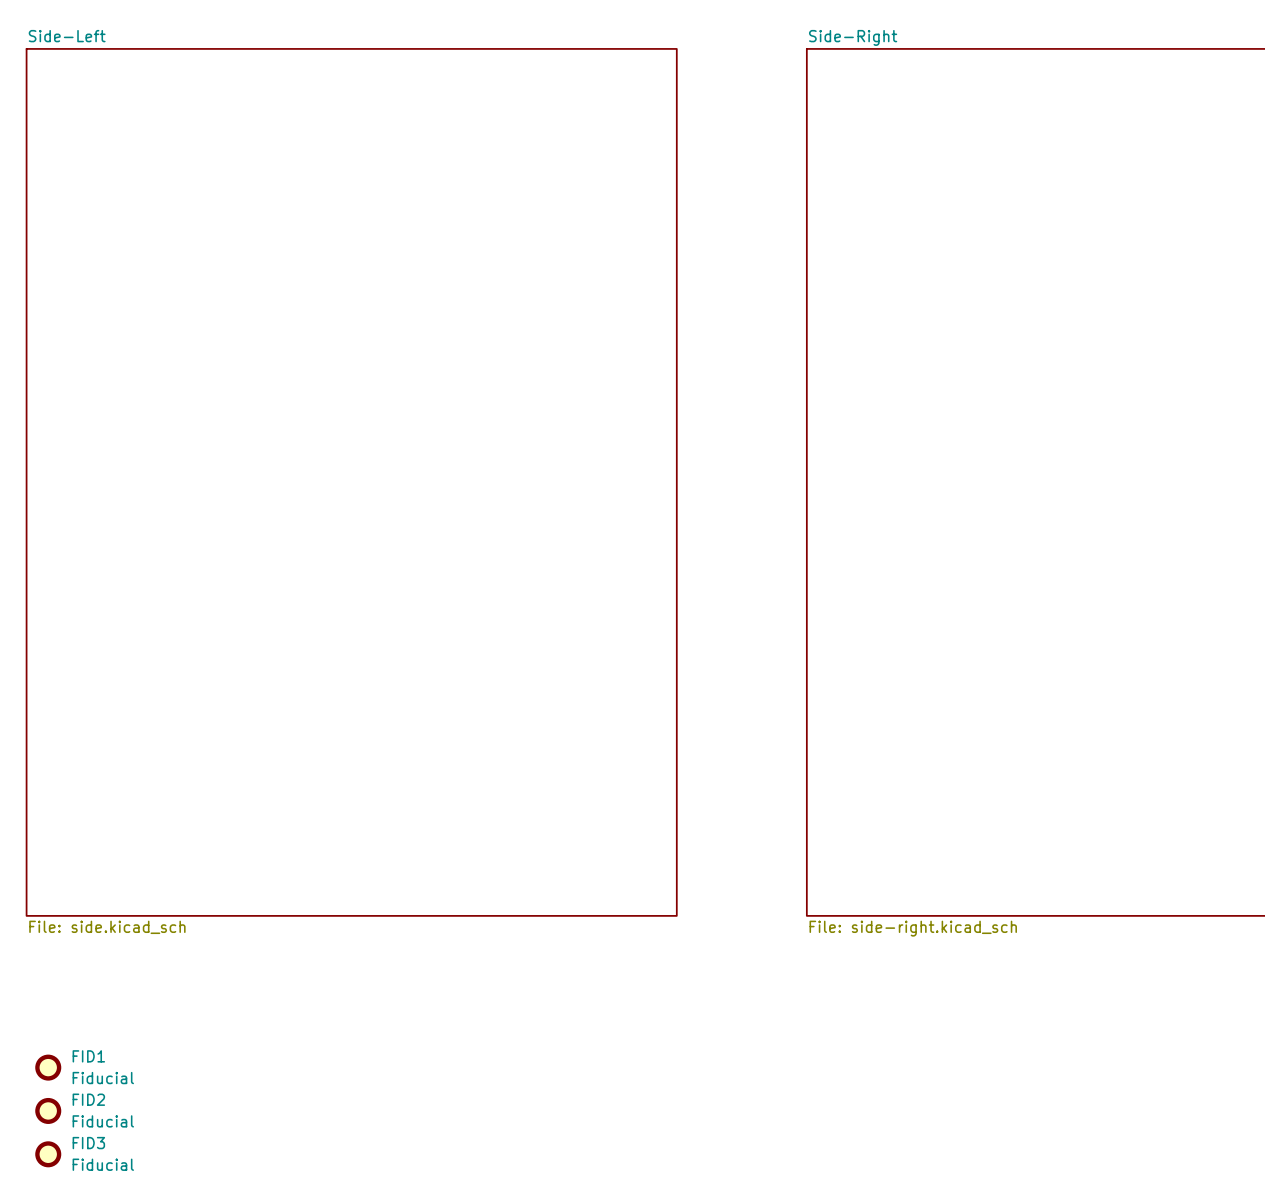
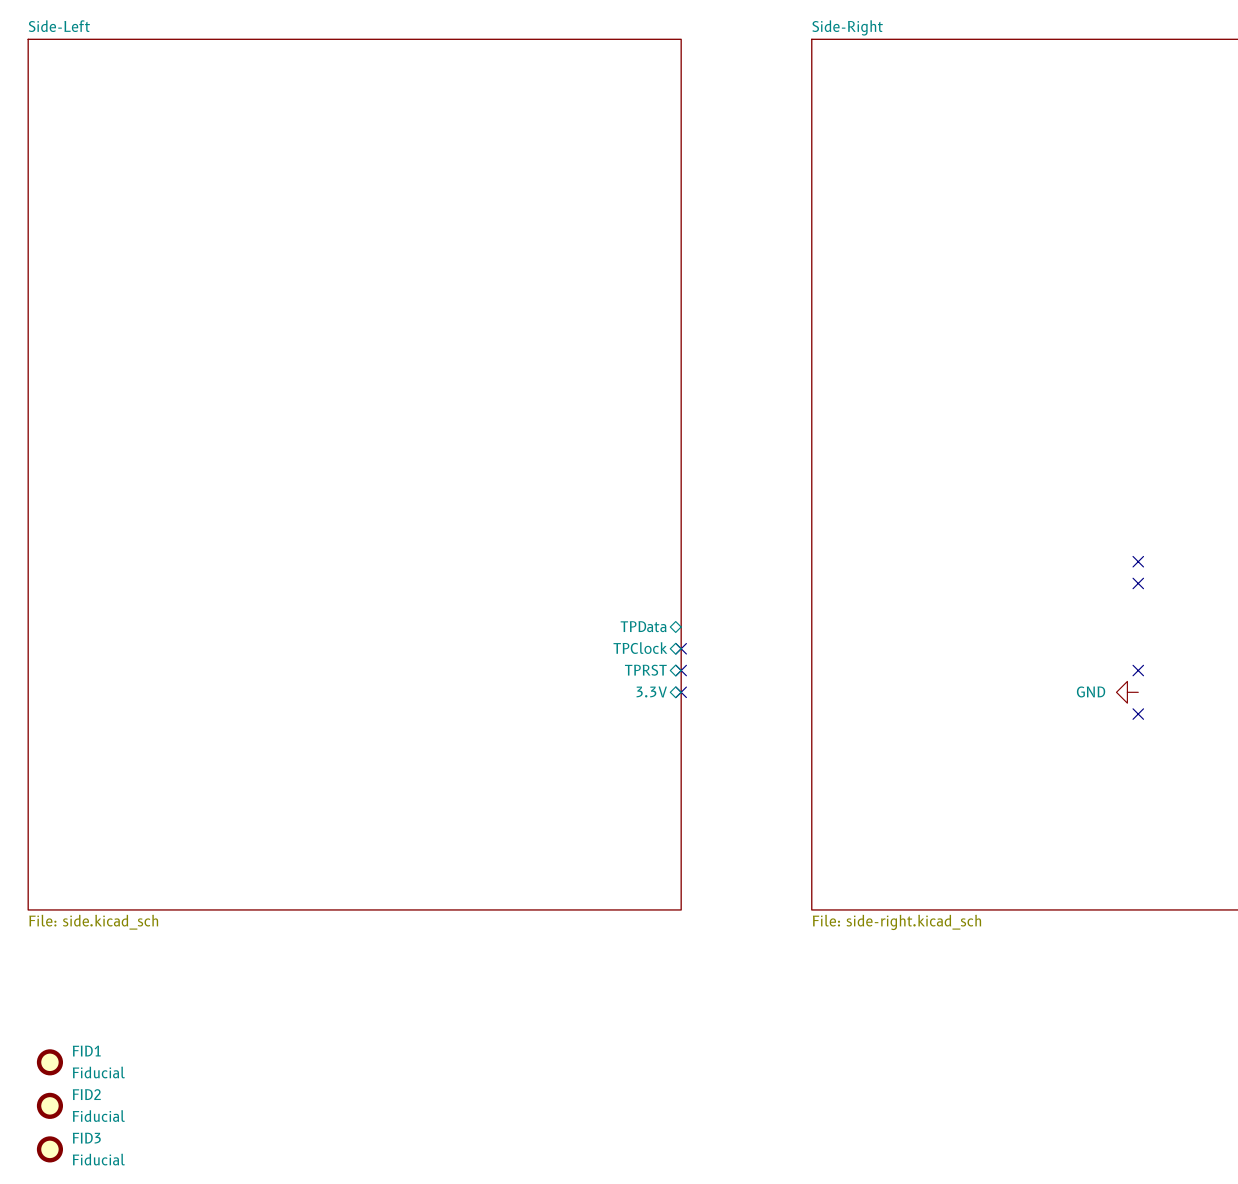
no-connect mark: none -> (1138, 561)
no-connect mark: none -> (1138, 583)
sheet pin: none -> TPData (643, 626)
sheet pin: none -> TPClock (640, 648)
no-connect mark: none -> (681, 648)
sheet pin: none -> TPRST (645, 670)
no-connect mark: none -> (681, 670)
no-connect mark: none -> (1138, 670)
sheet pin: none -> 3.3V (651, 691)
no-connect mark: none -> (681, 692)
power symbol: none -> GND (1127, 692)
no-connect mark: none -> (1138, 714)

